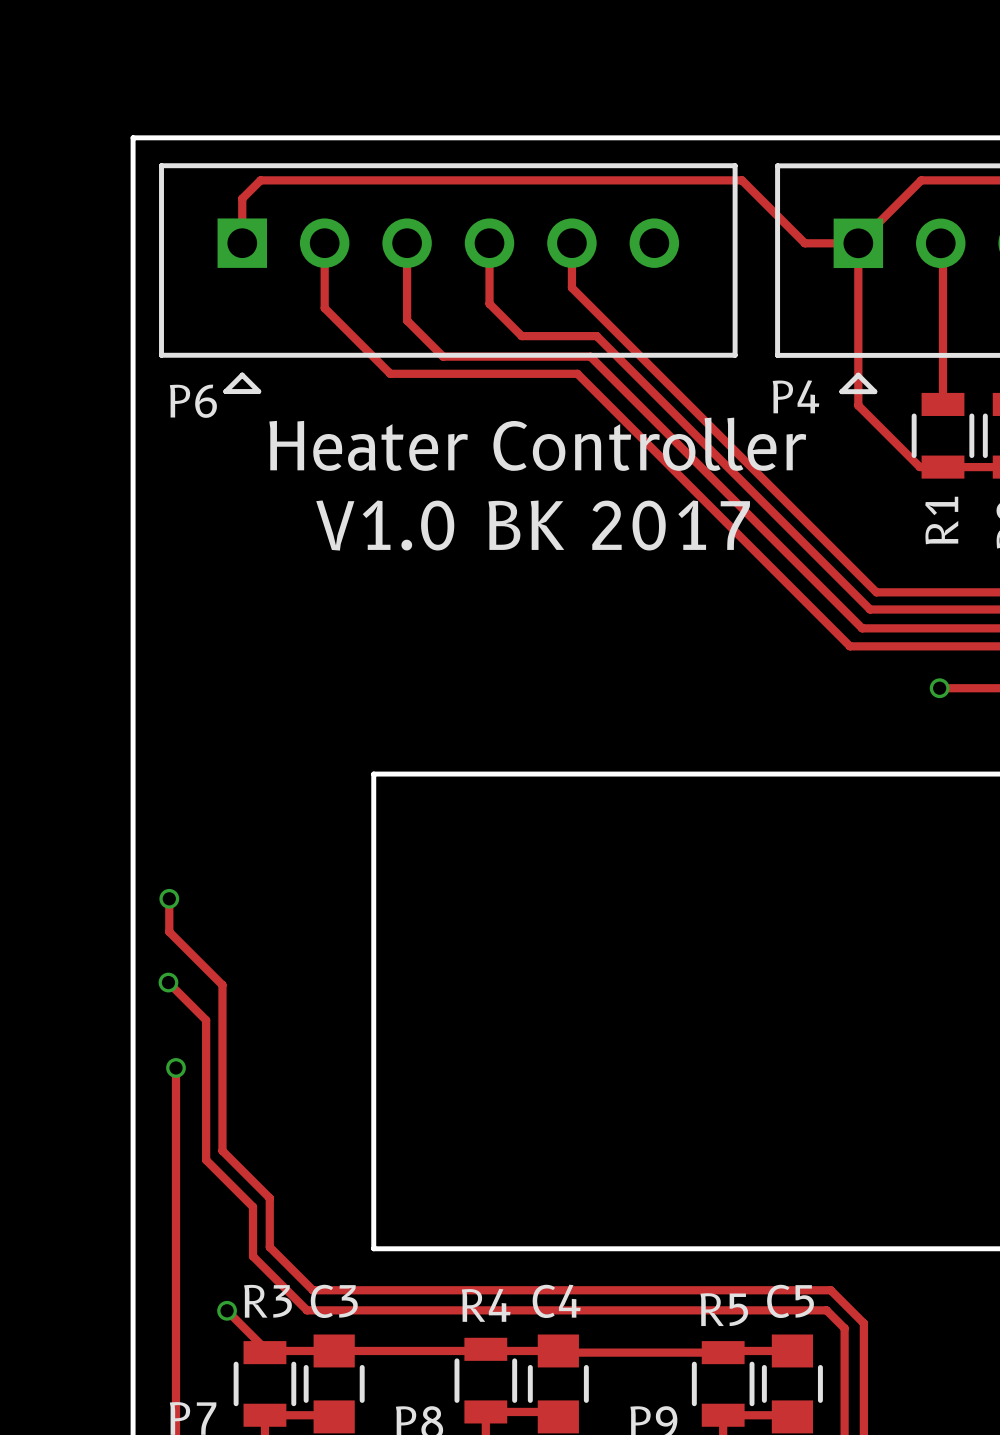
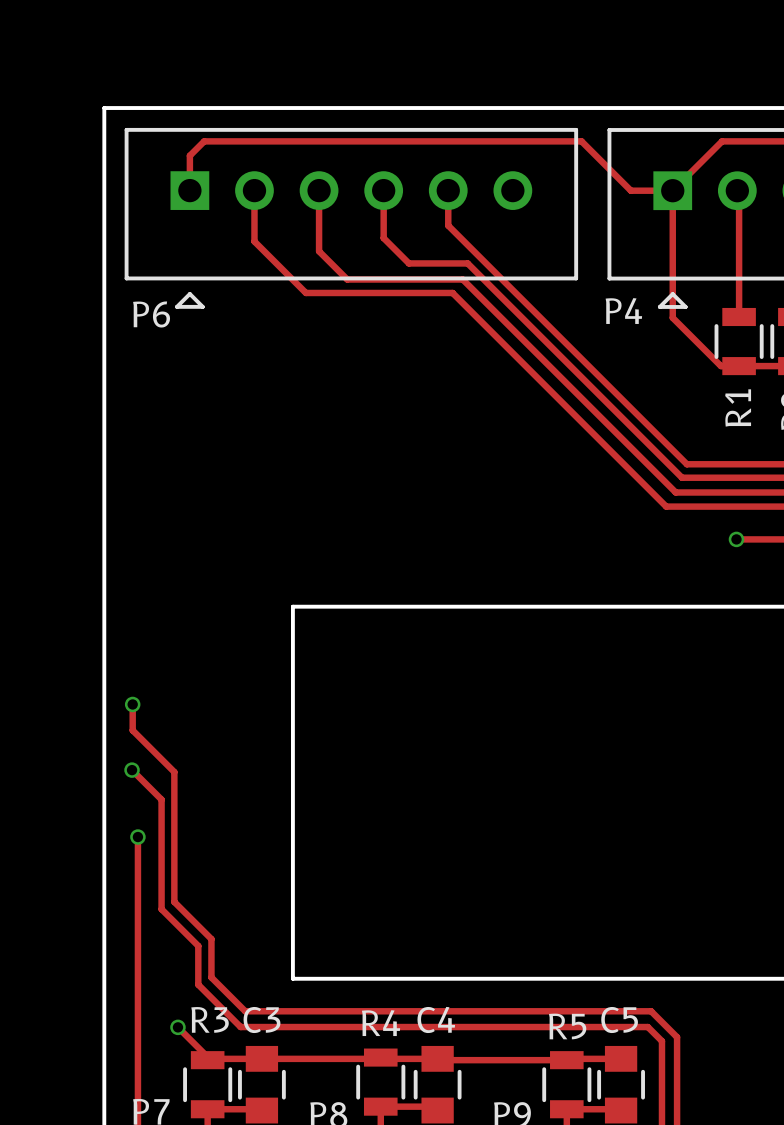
text: Heater Controller (537, 444) -> none
text: V1.0 BK 2017 (533, 525) -> none

